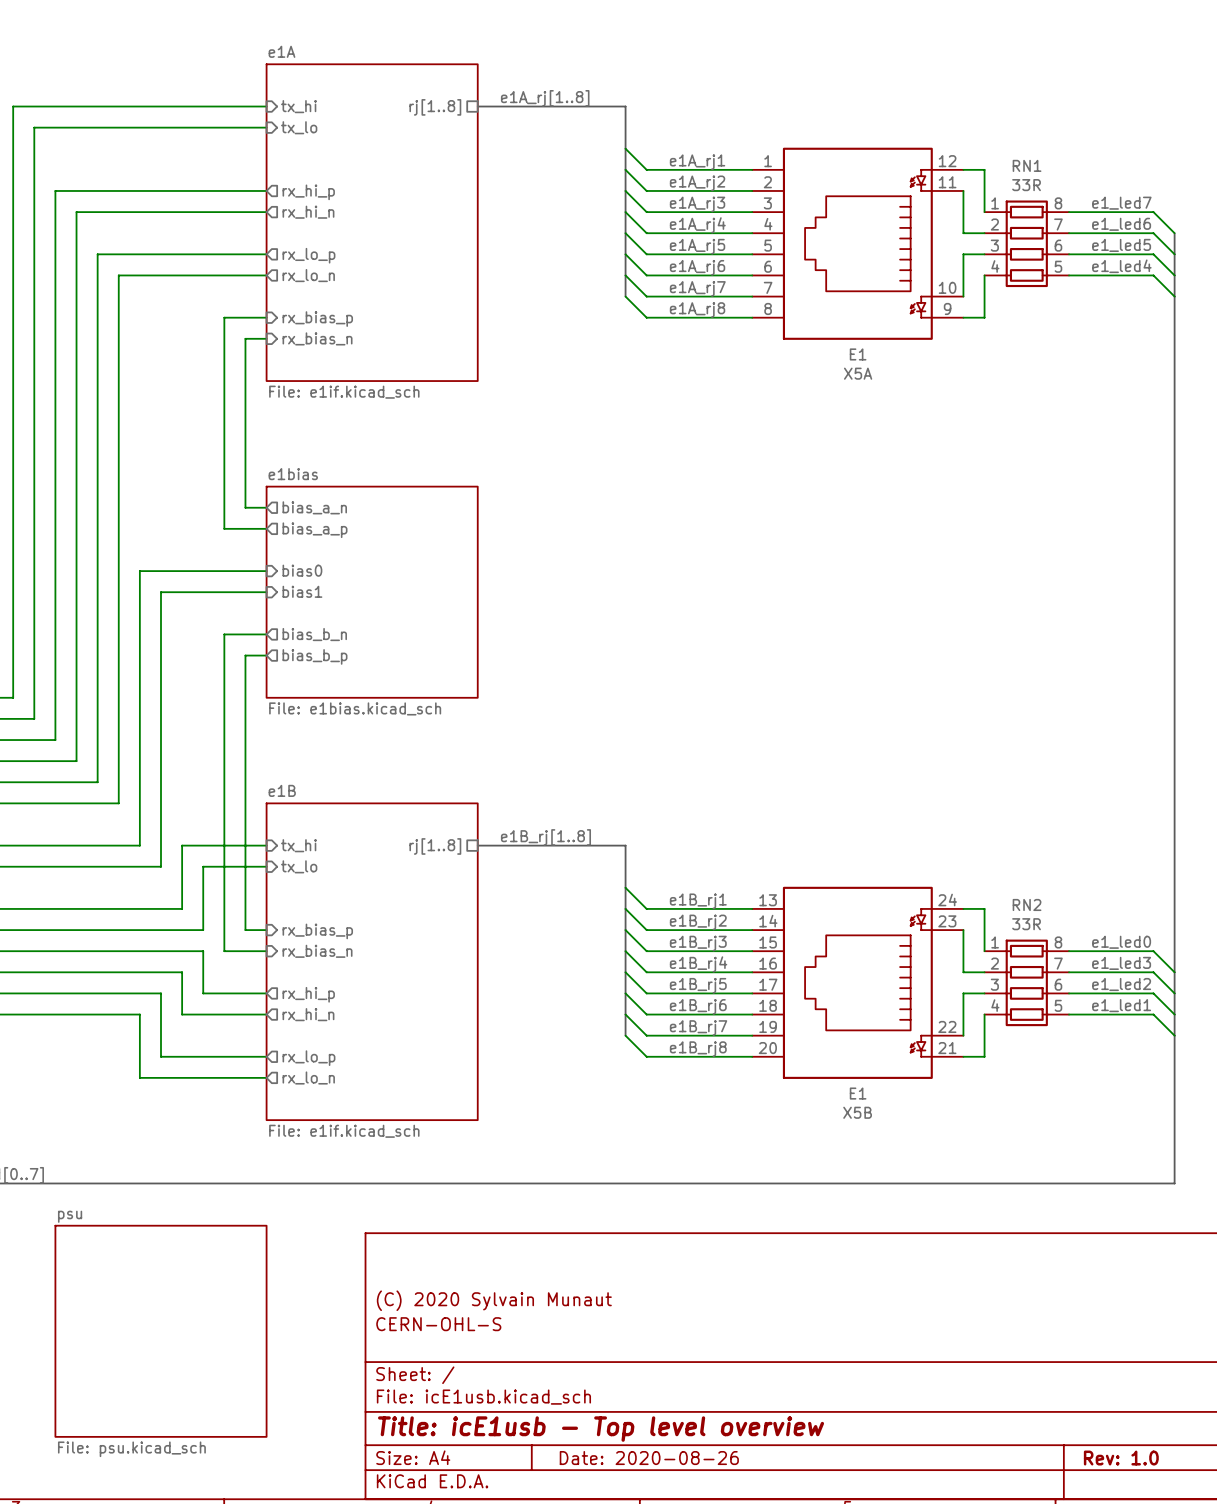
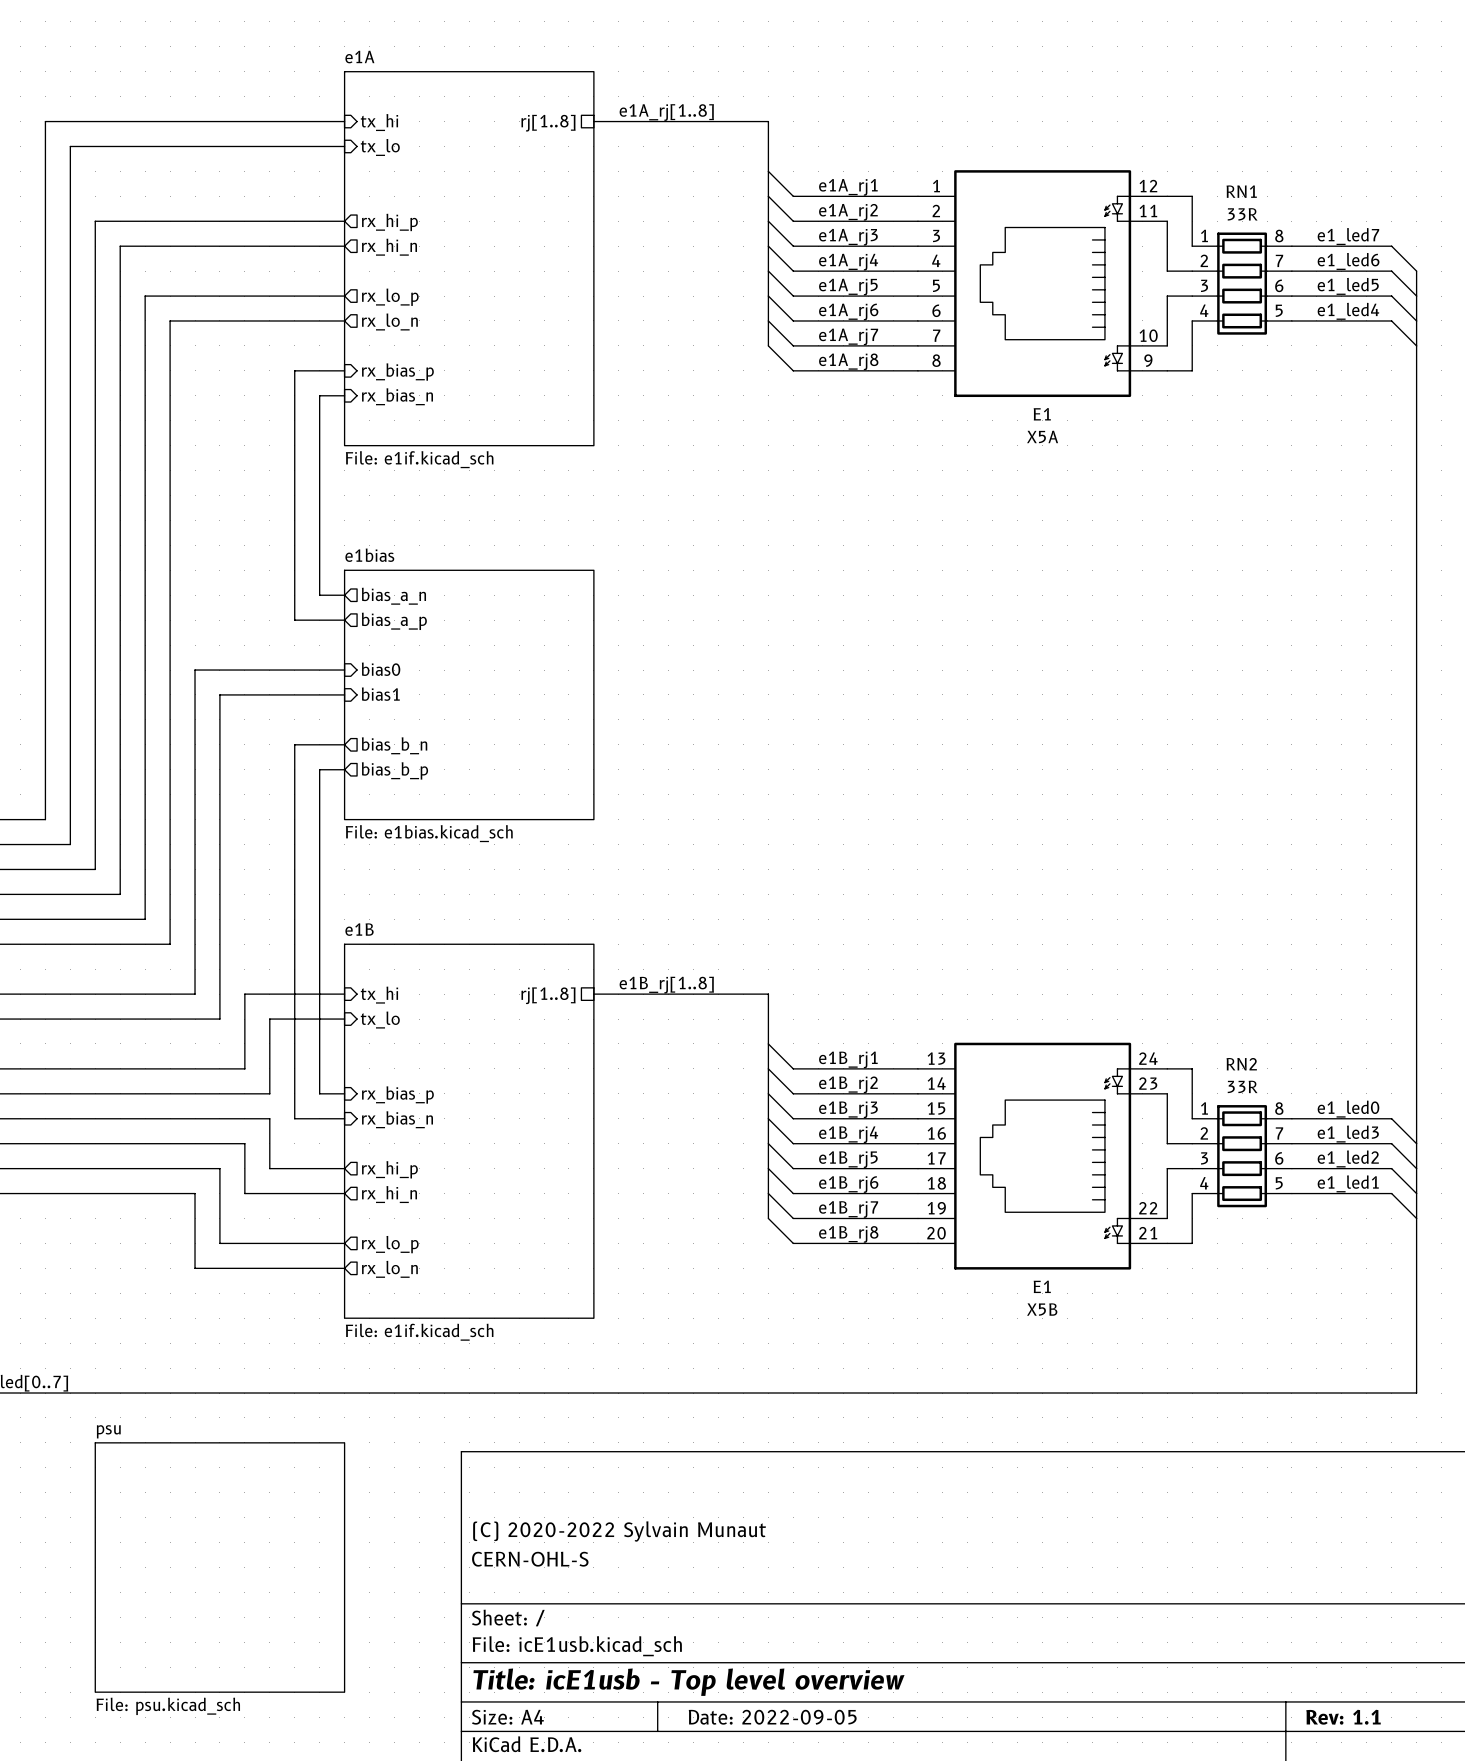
title block: (C) 2020 Sylvain Munaut (494, 1300) -> (C) 2020-2022 Sylvain Munaut (619, 1531)
title block: Date: 2020-08-26 (649, 1458) -> Date: 2022-09-05 (772, 1717)
title block: Rev: 1.0 (1121, 1458) -> Rev: 1.1 (1343, 1717)

